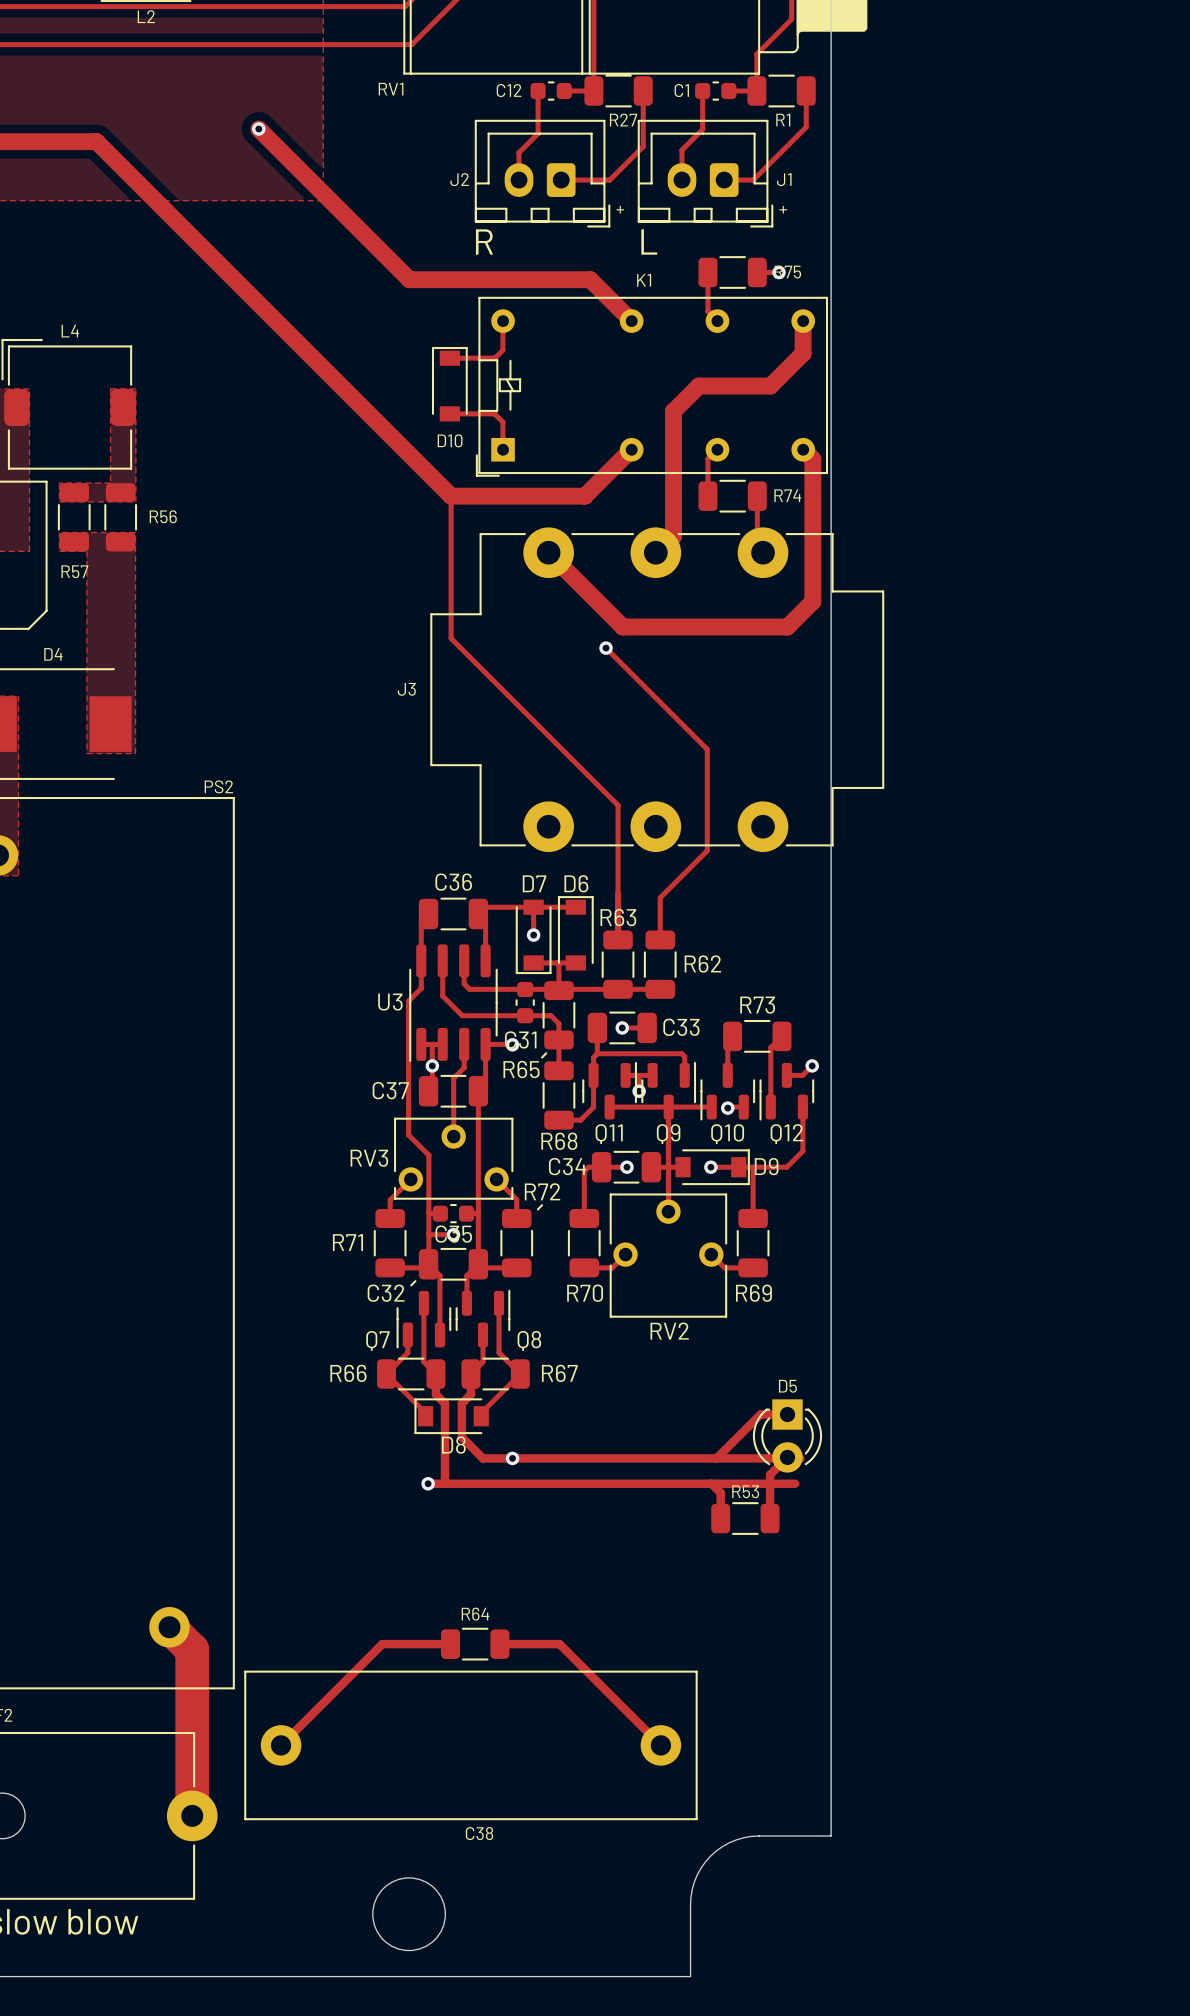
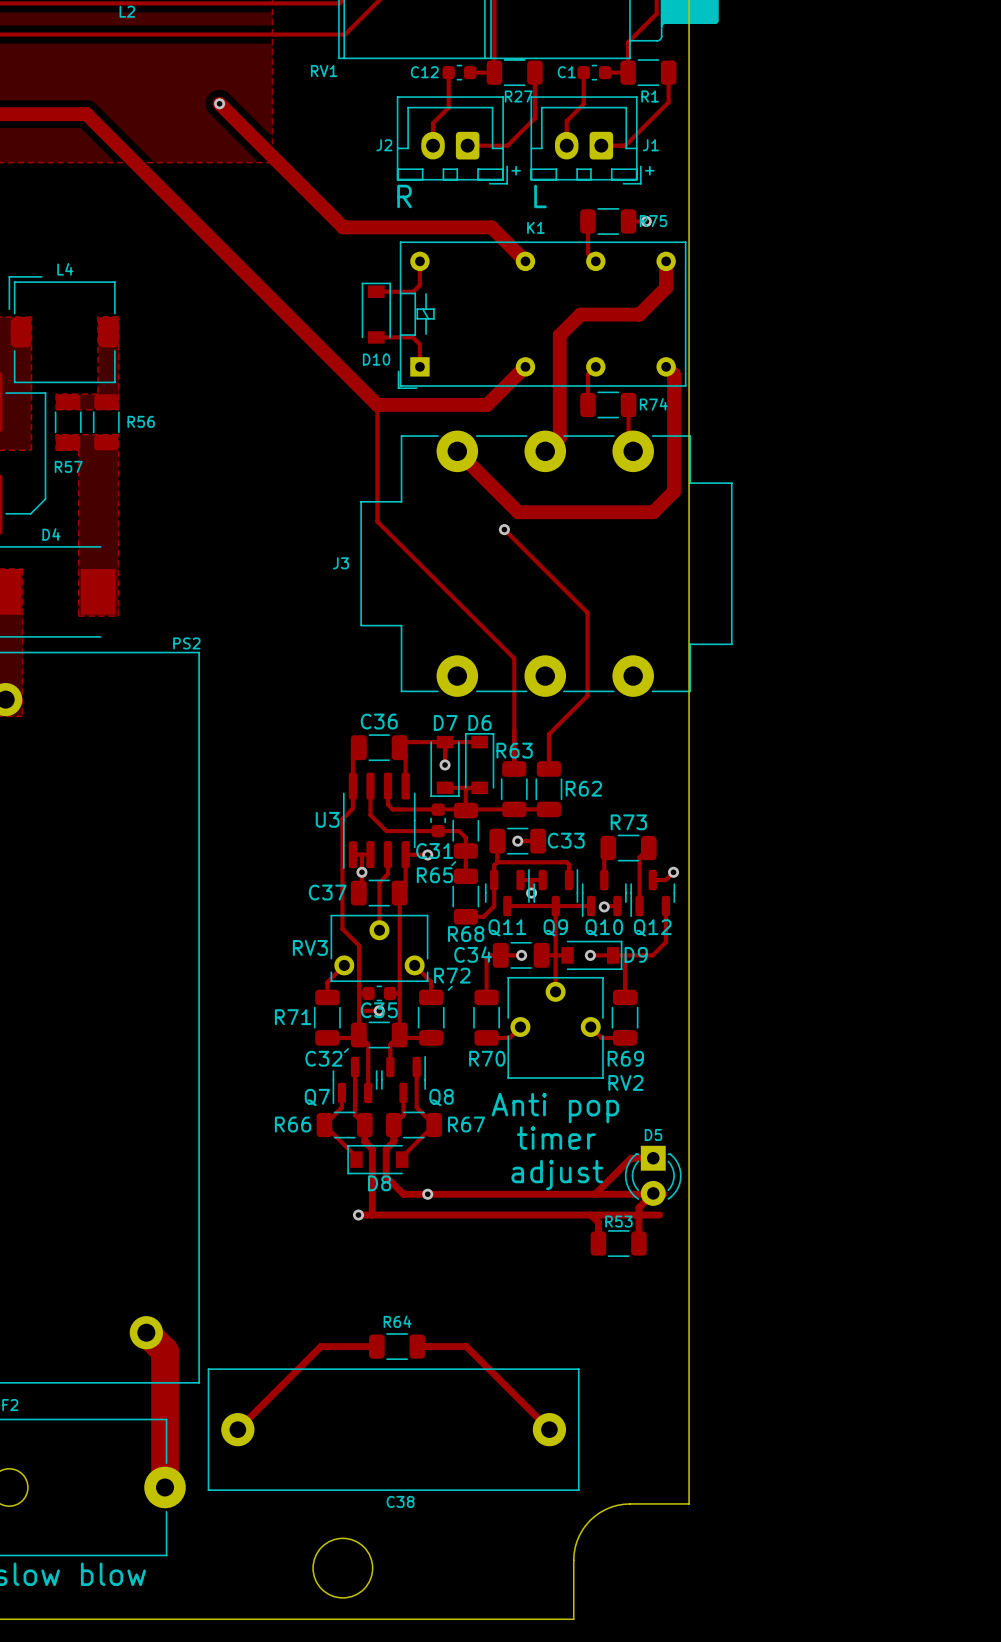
RV2 name position: RV2 (669, 1331) -> RV2 (625, 1082)
text: none -> Anti pop (555, 1108)
text: none -> timer (556, 1138)
text: none -> adjust (557, 1174)

